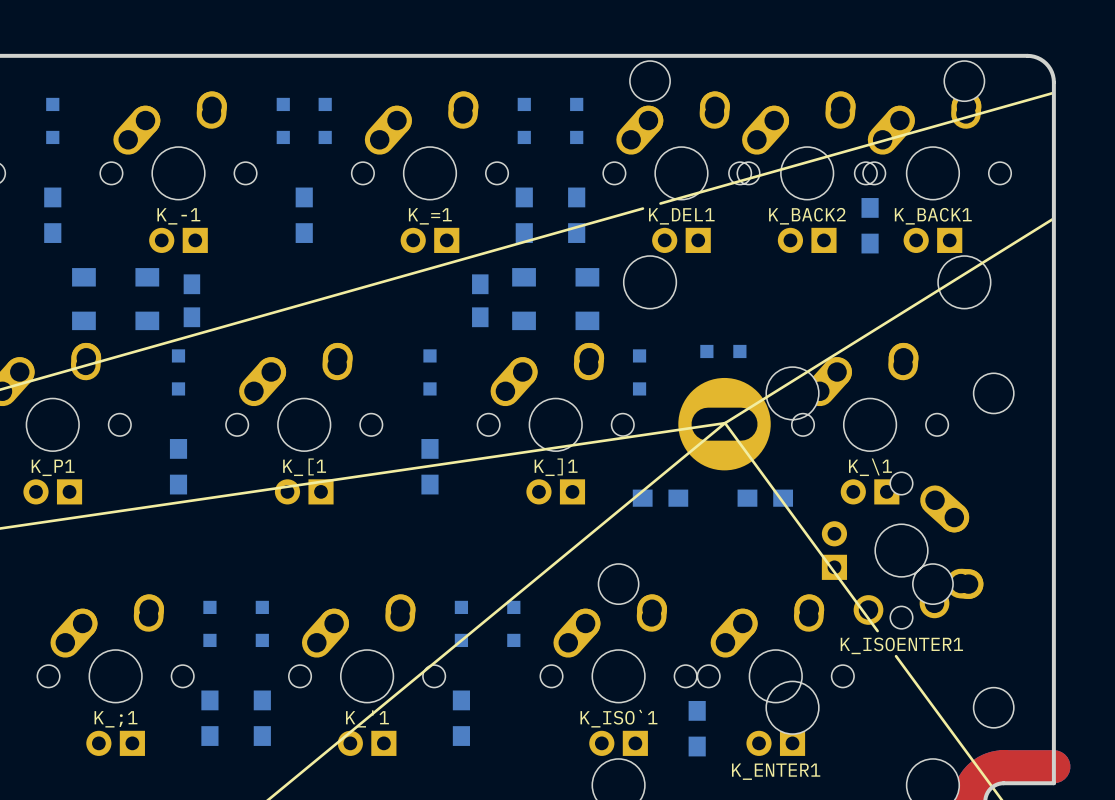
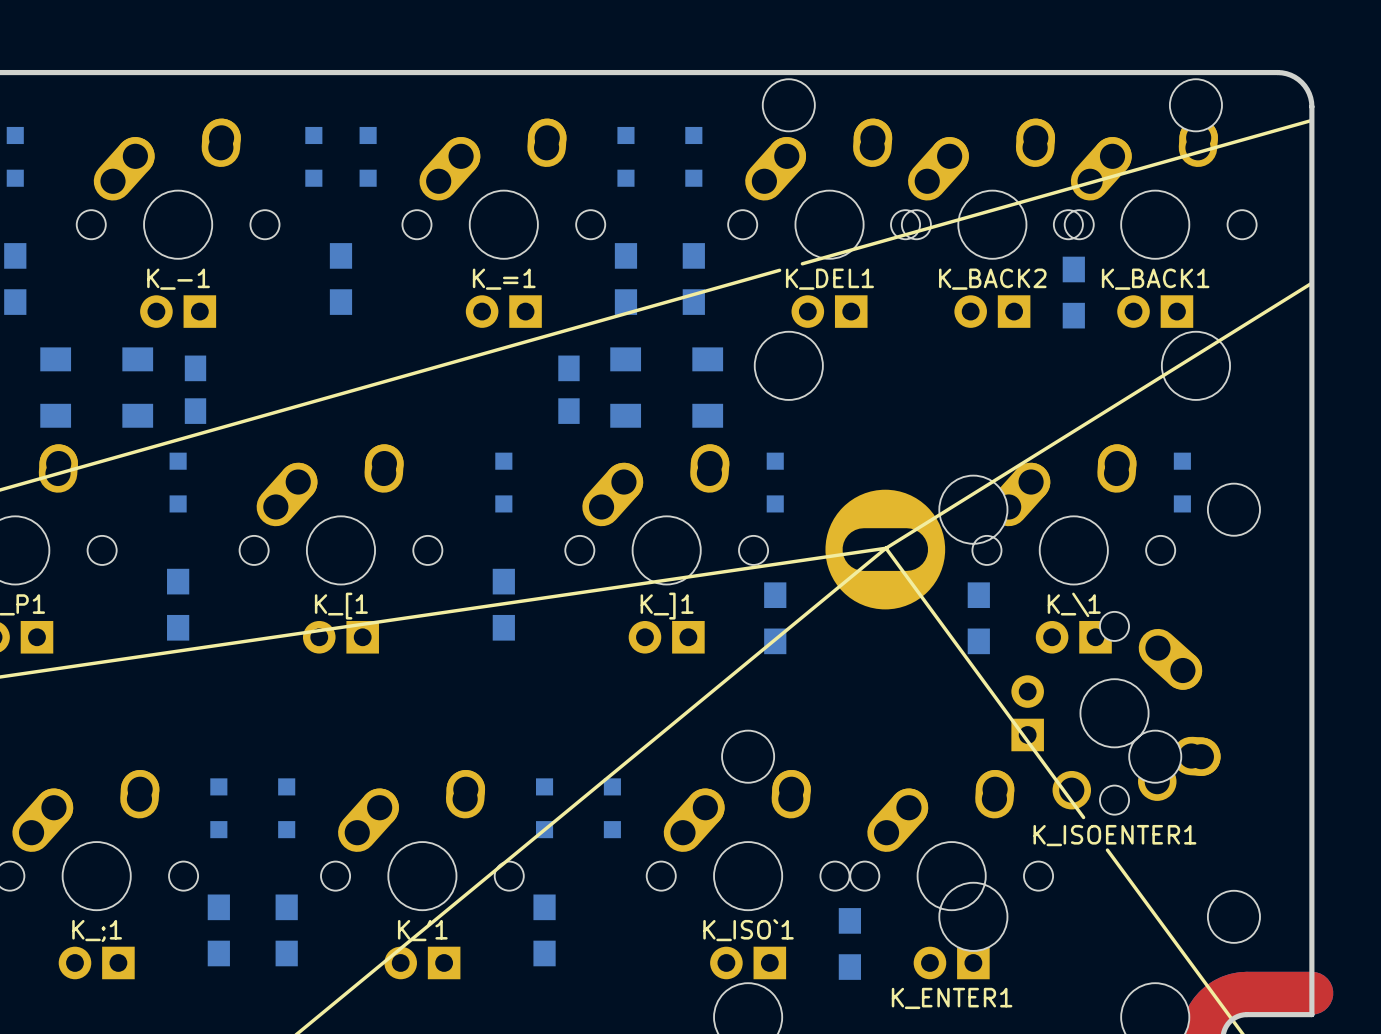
part rotation: 0° (723, 351) -> 90° clockwise (1182, 482)
part position: (723, 351) -> (1182, 482)
part rotation: 0° (660, 498) -> 90° clockwise (775, 618)
part rotation: 0° (765, 498) -> 90° clockwise (978, 618)
part position: (765, 498) -> (978, 618)

